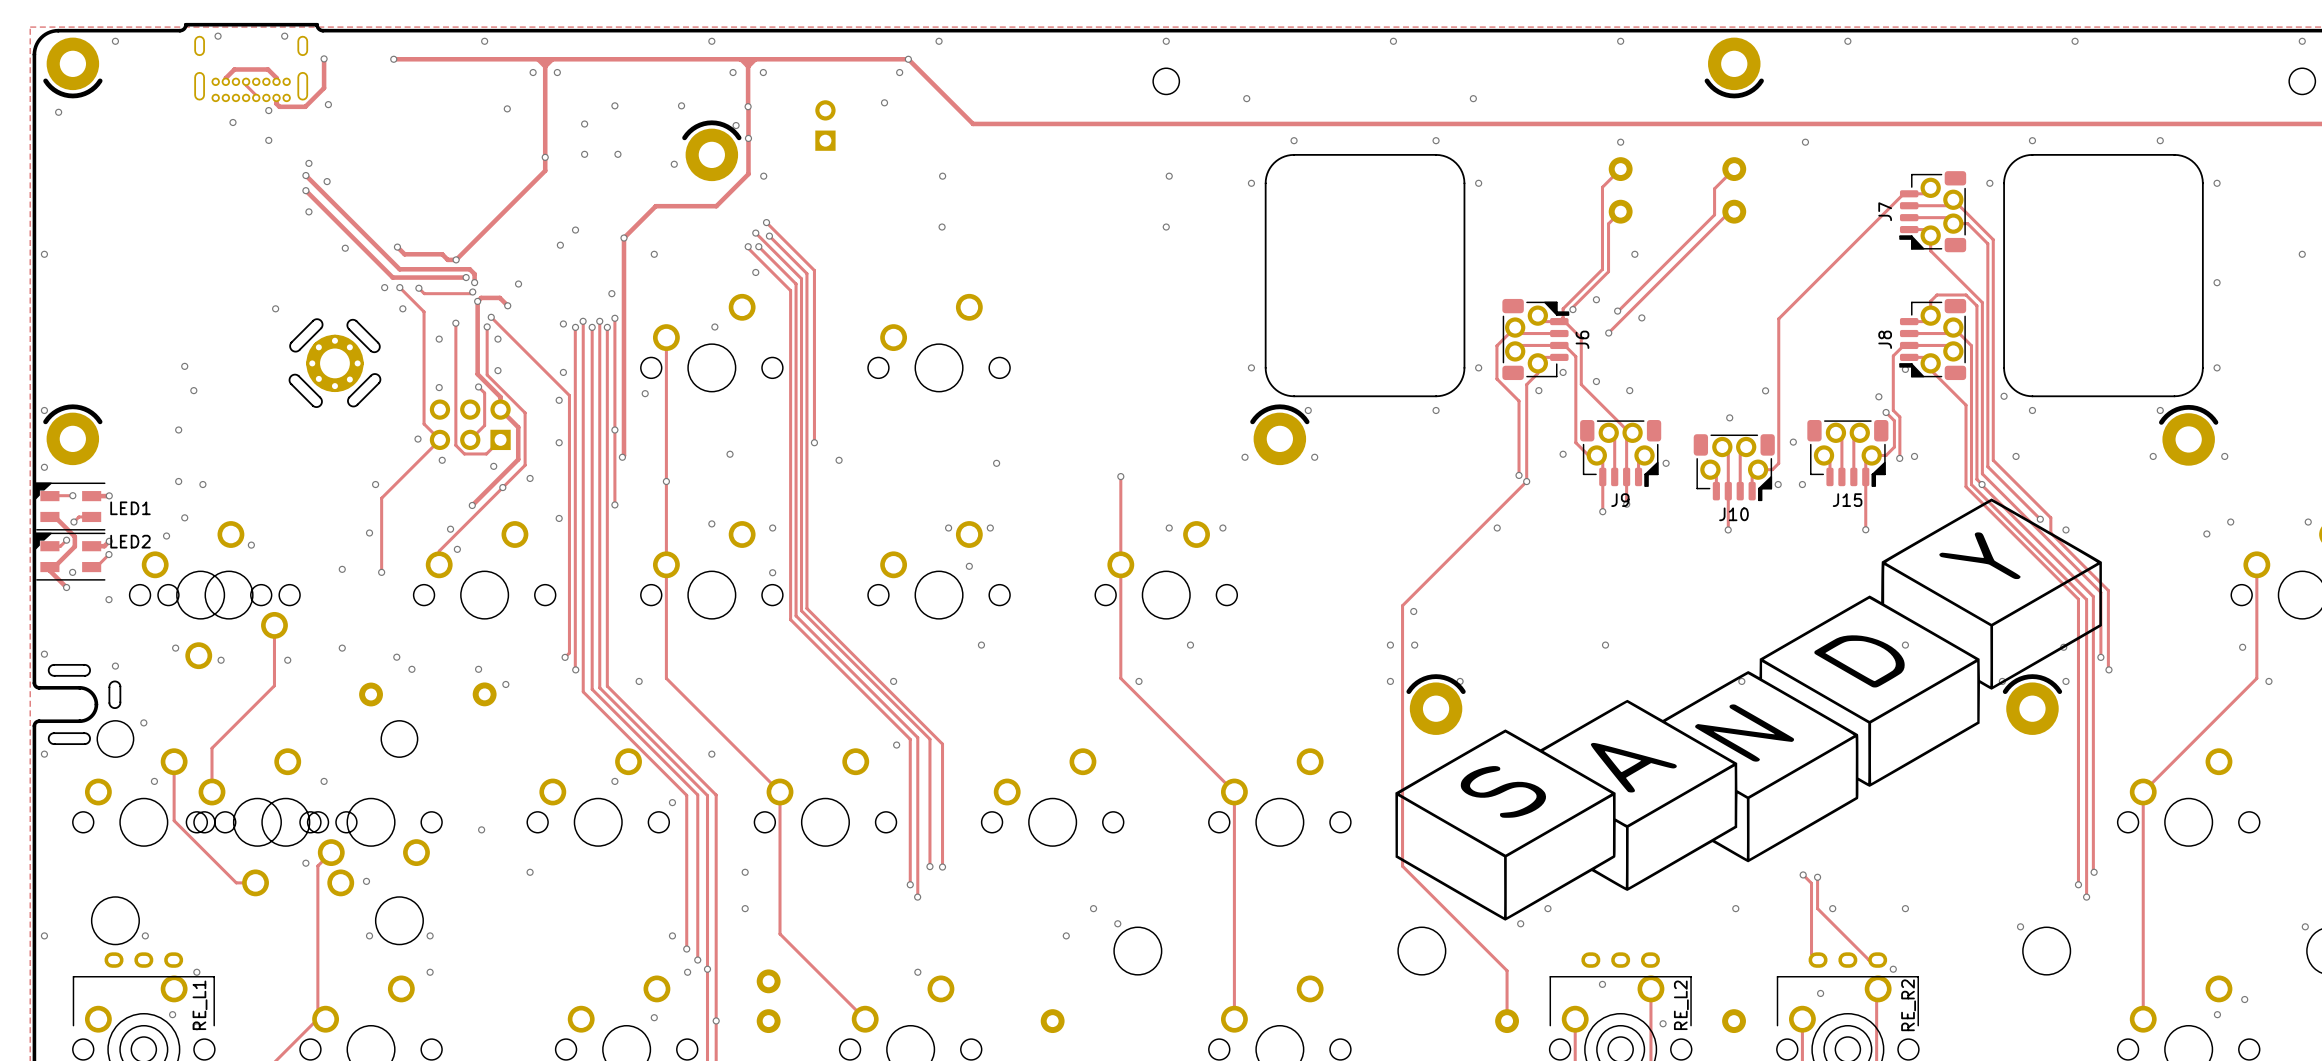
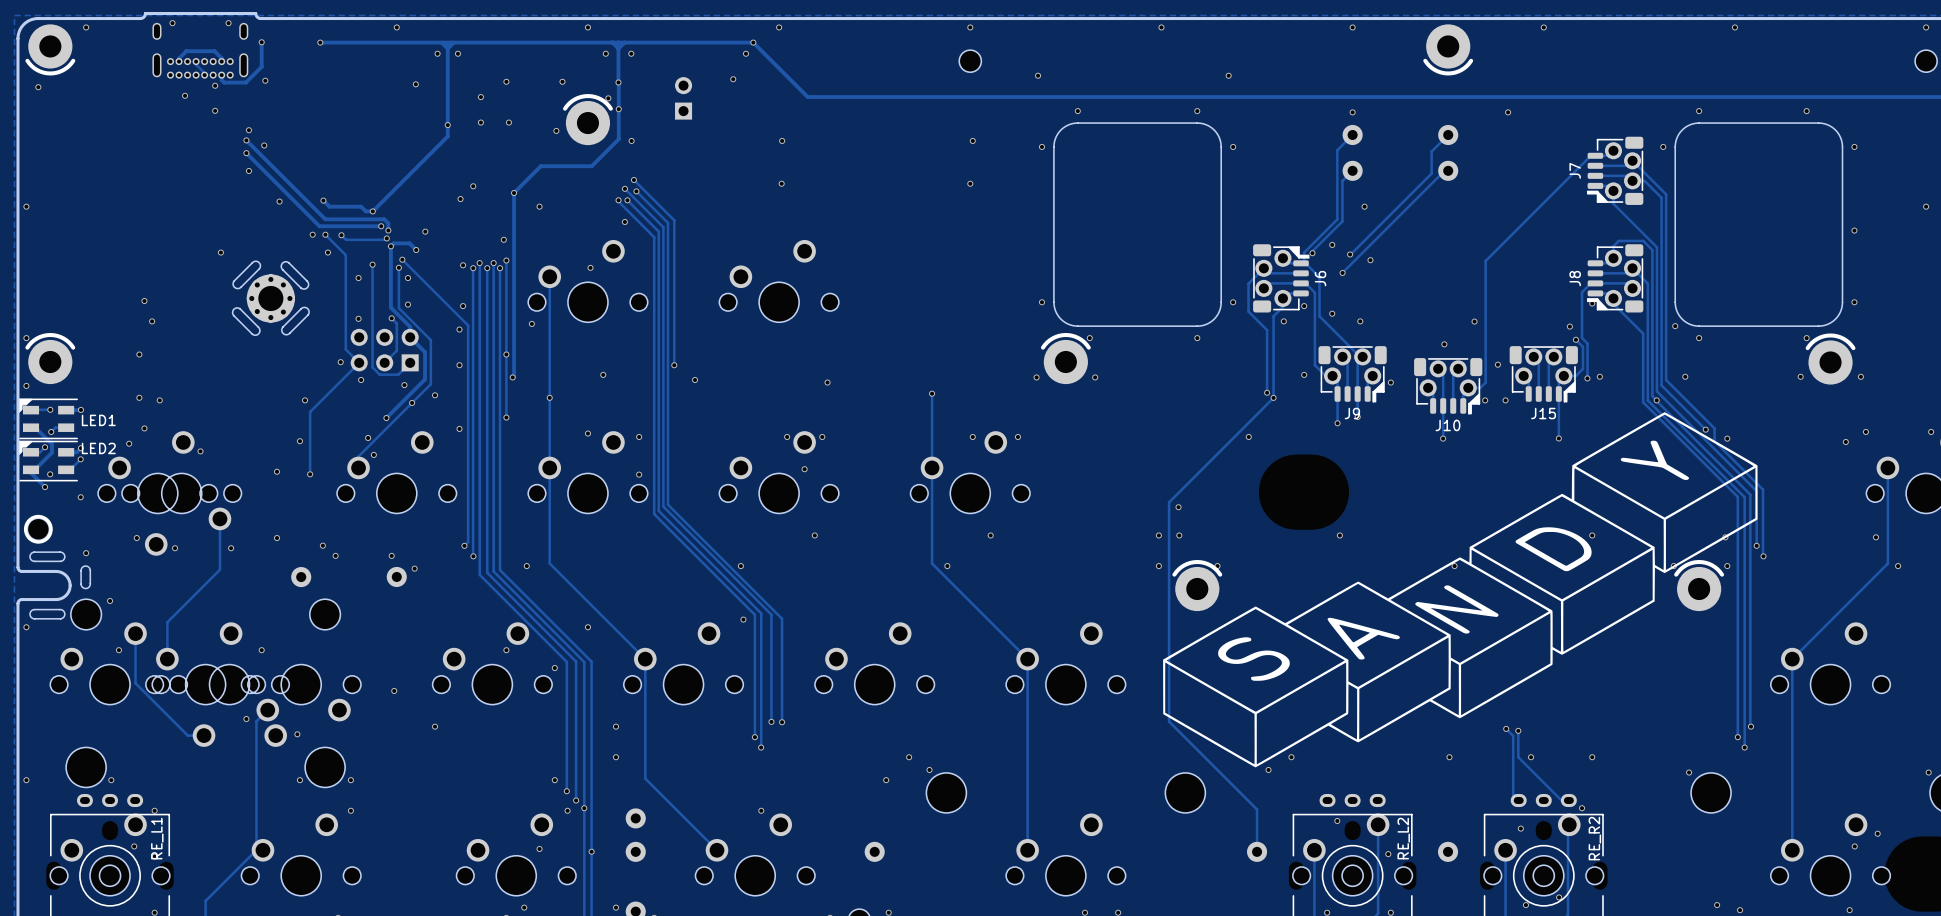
part: none -> (38, 529)
via: (44, 654) -> none

